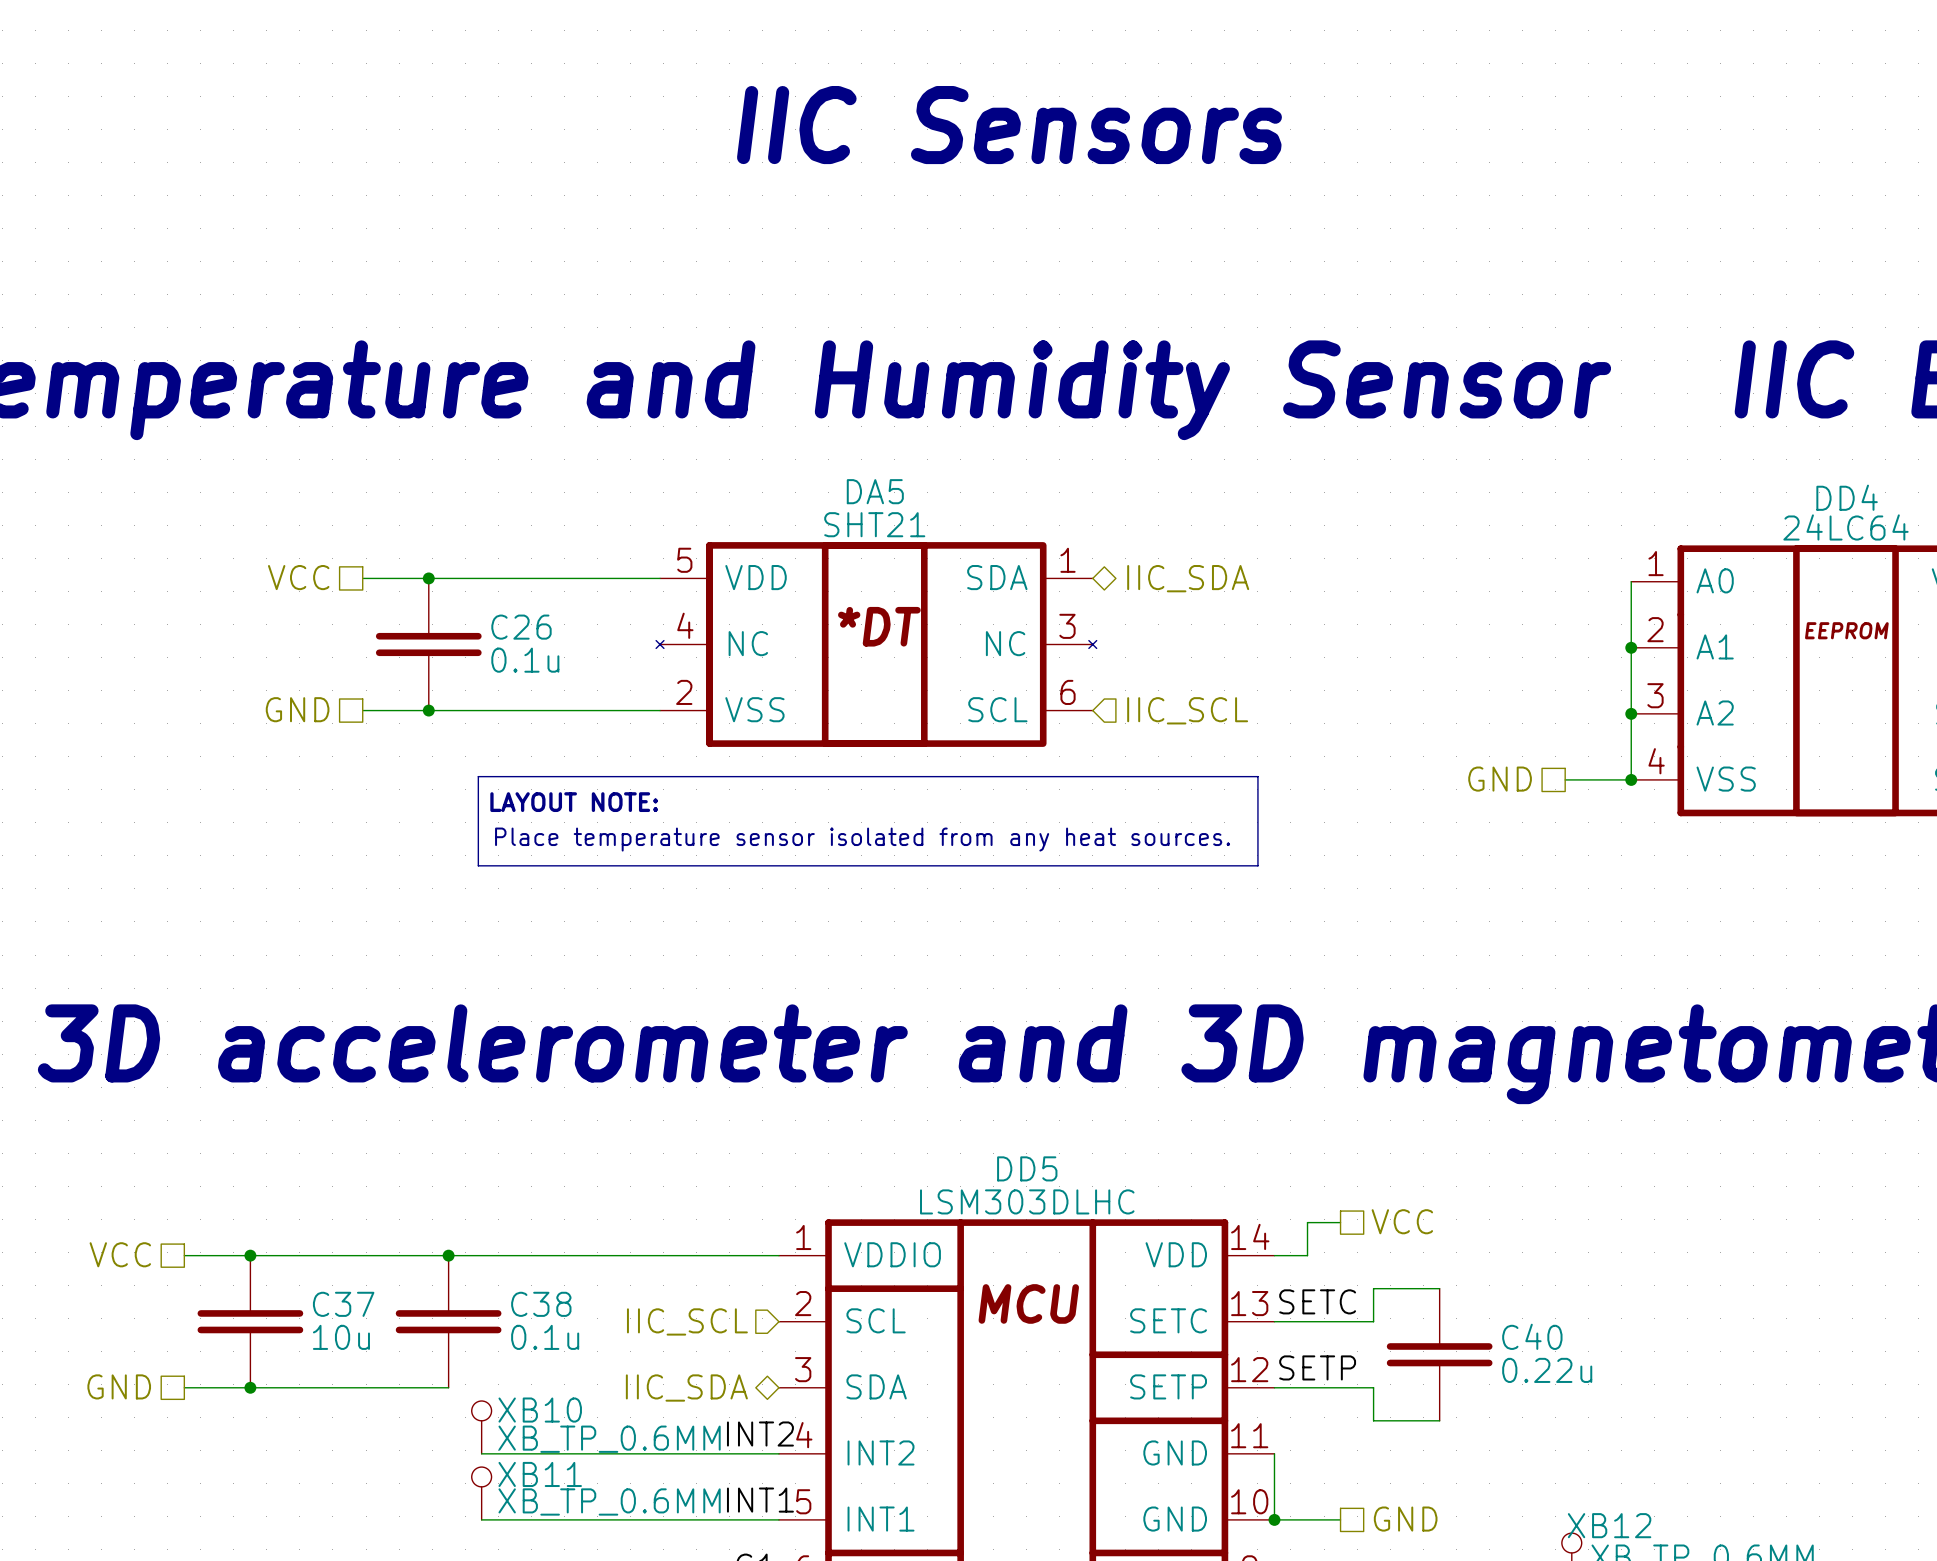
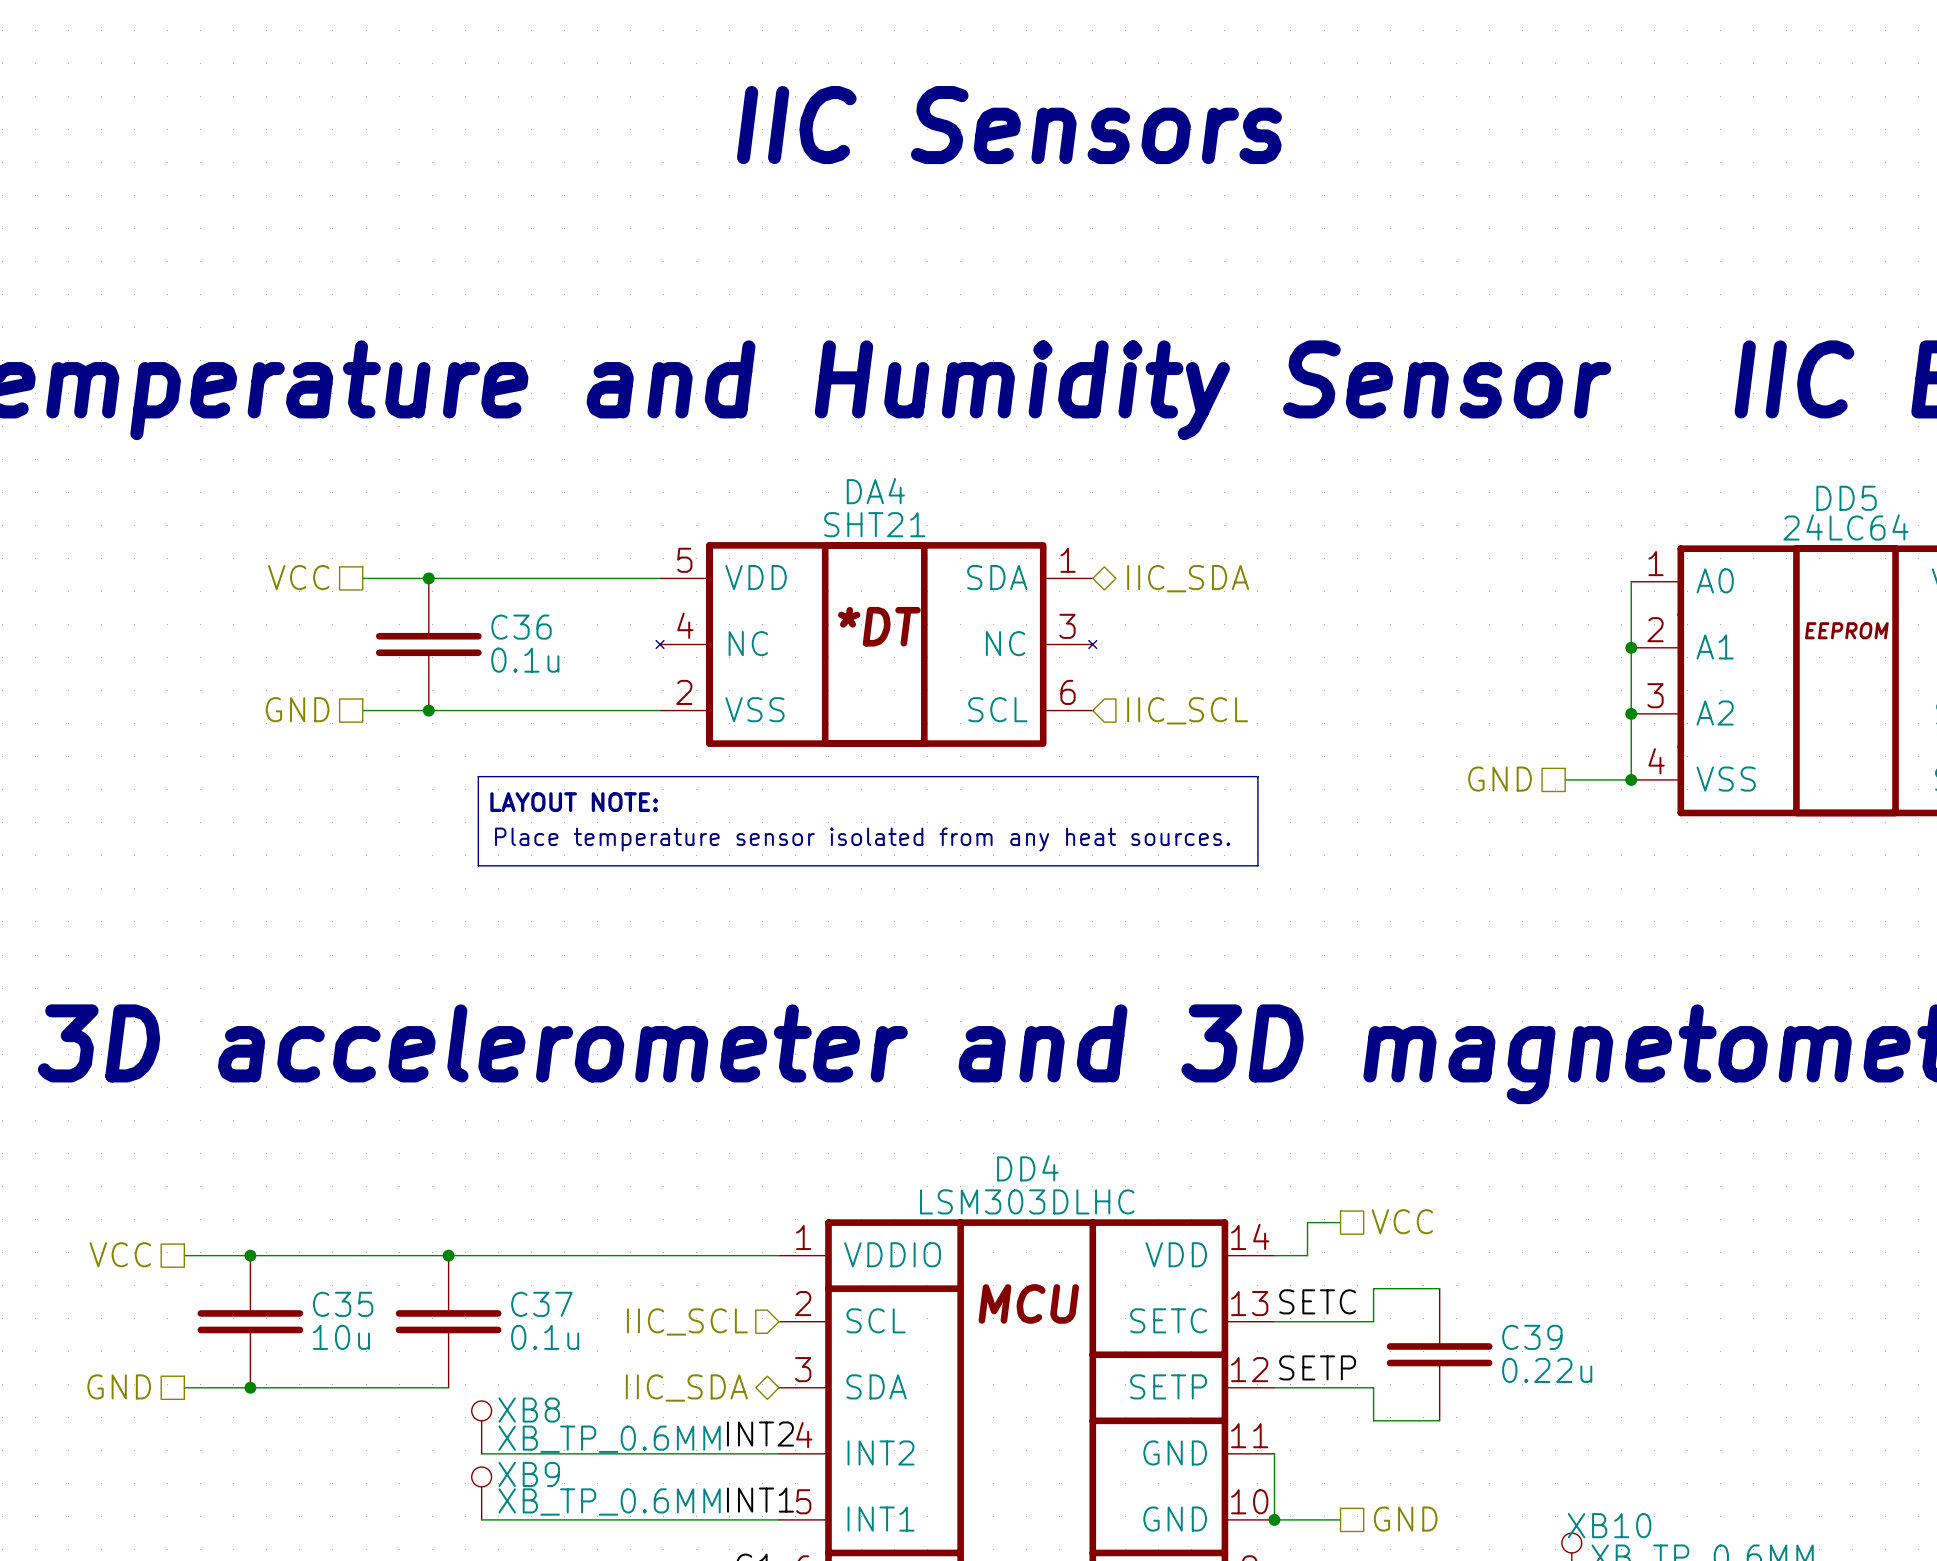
DA5 name: DA5 (875, 491) -> DA4 (875, 491)
DD4 name: DD4 (1847, 497) -> DD5 (1846, 498)
C26 name: C26 (521, 627) -> C36 (521, 627)
DD5 name: DD5 (1027, 1168) -> DD4 (1027, 1168)
C37 name: C37 (343, 1304) -> C35 (343, 1304)
C38 name: C38 (541, 1304) -> C37 (541, 1304)
C40 name: C40 (1532, 1336) -> C39 (1532, 1337)
XB10 name: XB10 (540, 1410) -> XB8 (529, 1410)
XB11 name: XB11 (540, 1474) -> XB9 (529, 1474)
XB12 name: XB12 (1609, 1525) -> XB10 (1609, 1525)

